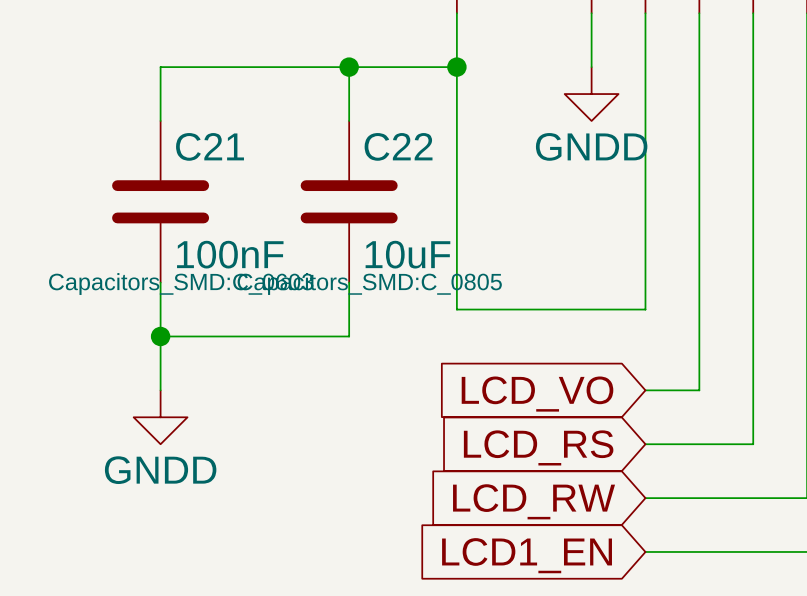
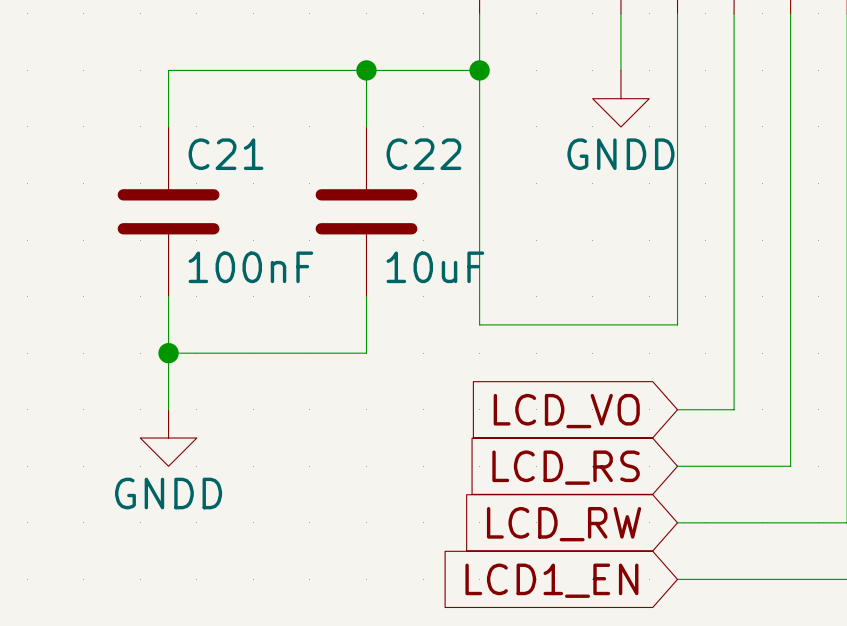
C21 text: Capacitors_SMD:C_0603 (181, 284) -> none
C22 text: Capacitors_SMD:C_0805 (369, 284) -> none

